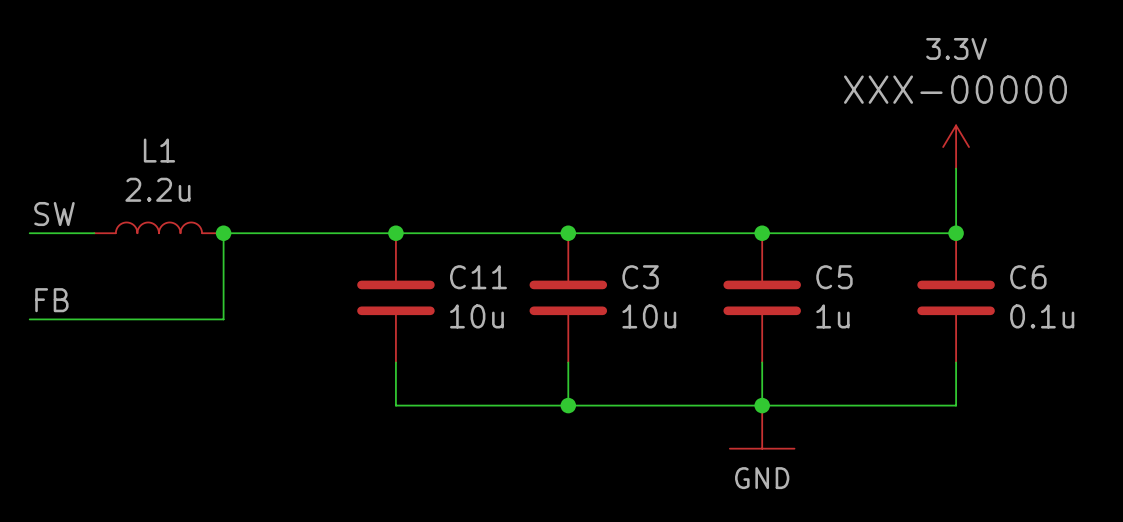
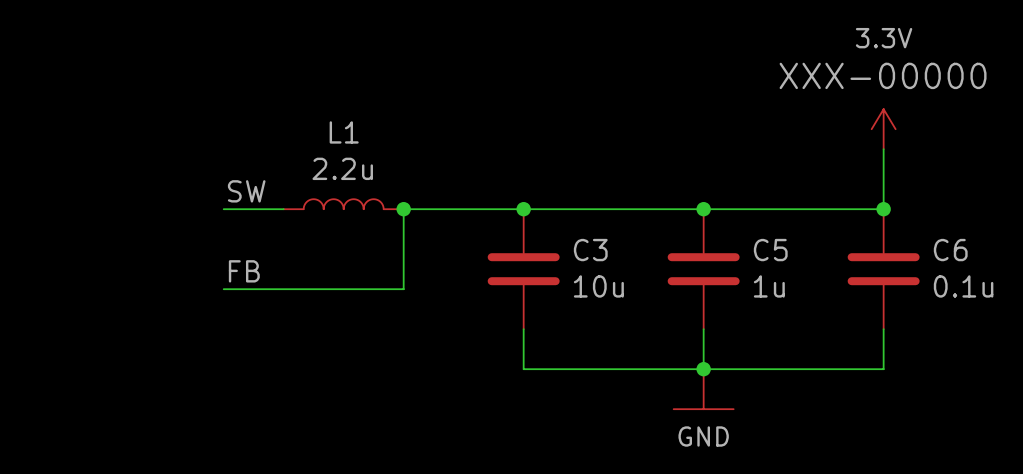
label position: SW (54, 214) -> SW (246, 191)
L1 position: (158, 227) -> (343, 204)
wire: (29, 233) (94, 233) -> none
junction: (223, 233) -> none
wire: (245, 233) (223, 233) (223, 319) (29, 319) -> none
wire: (309, 233) (439, 233) -> (223, 289) (403, 289) (403, 209)
junction position: (395, 233) -> (403, 209)
C11: 10u (395, 297) -> none
label position: FB (51, 300) -> FB (244, 271)
wire: (395, 362) (395, 405) (568, 405) -> none
junction: (568, 405) -> none

